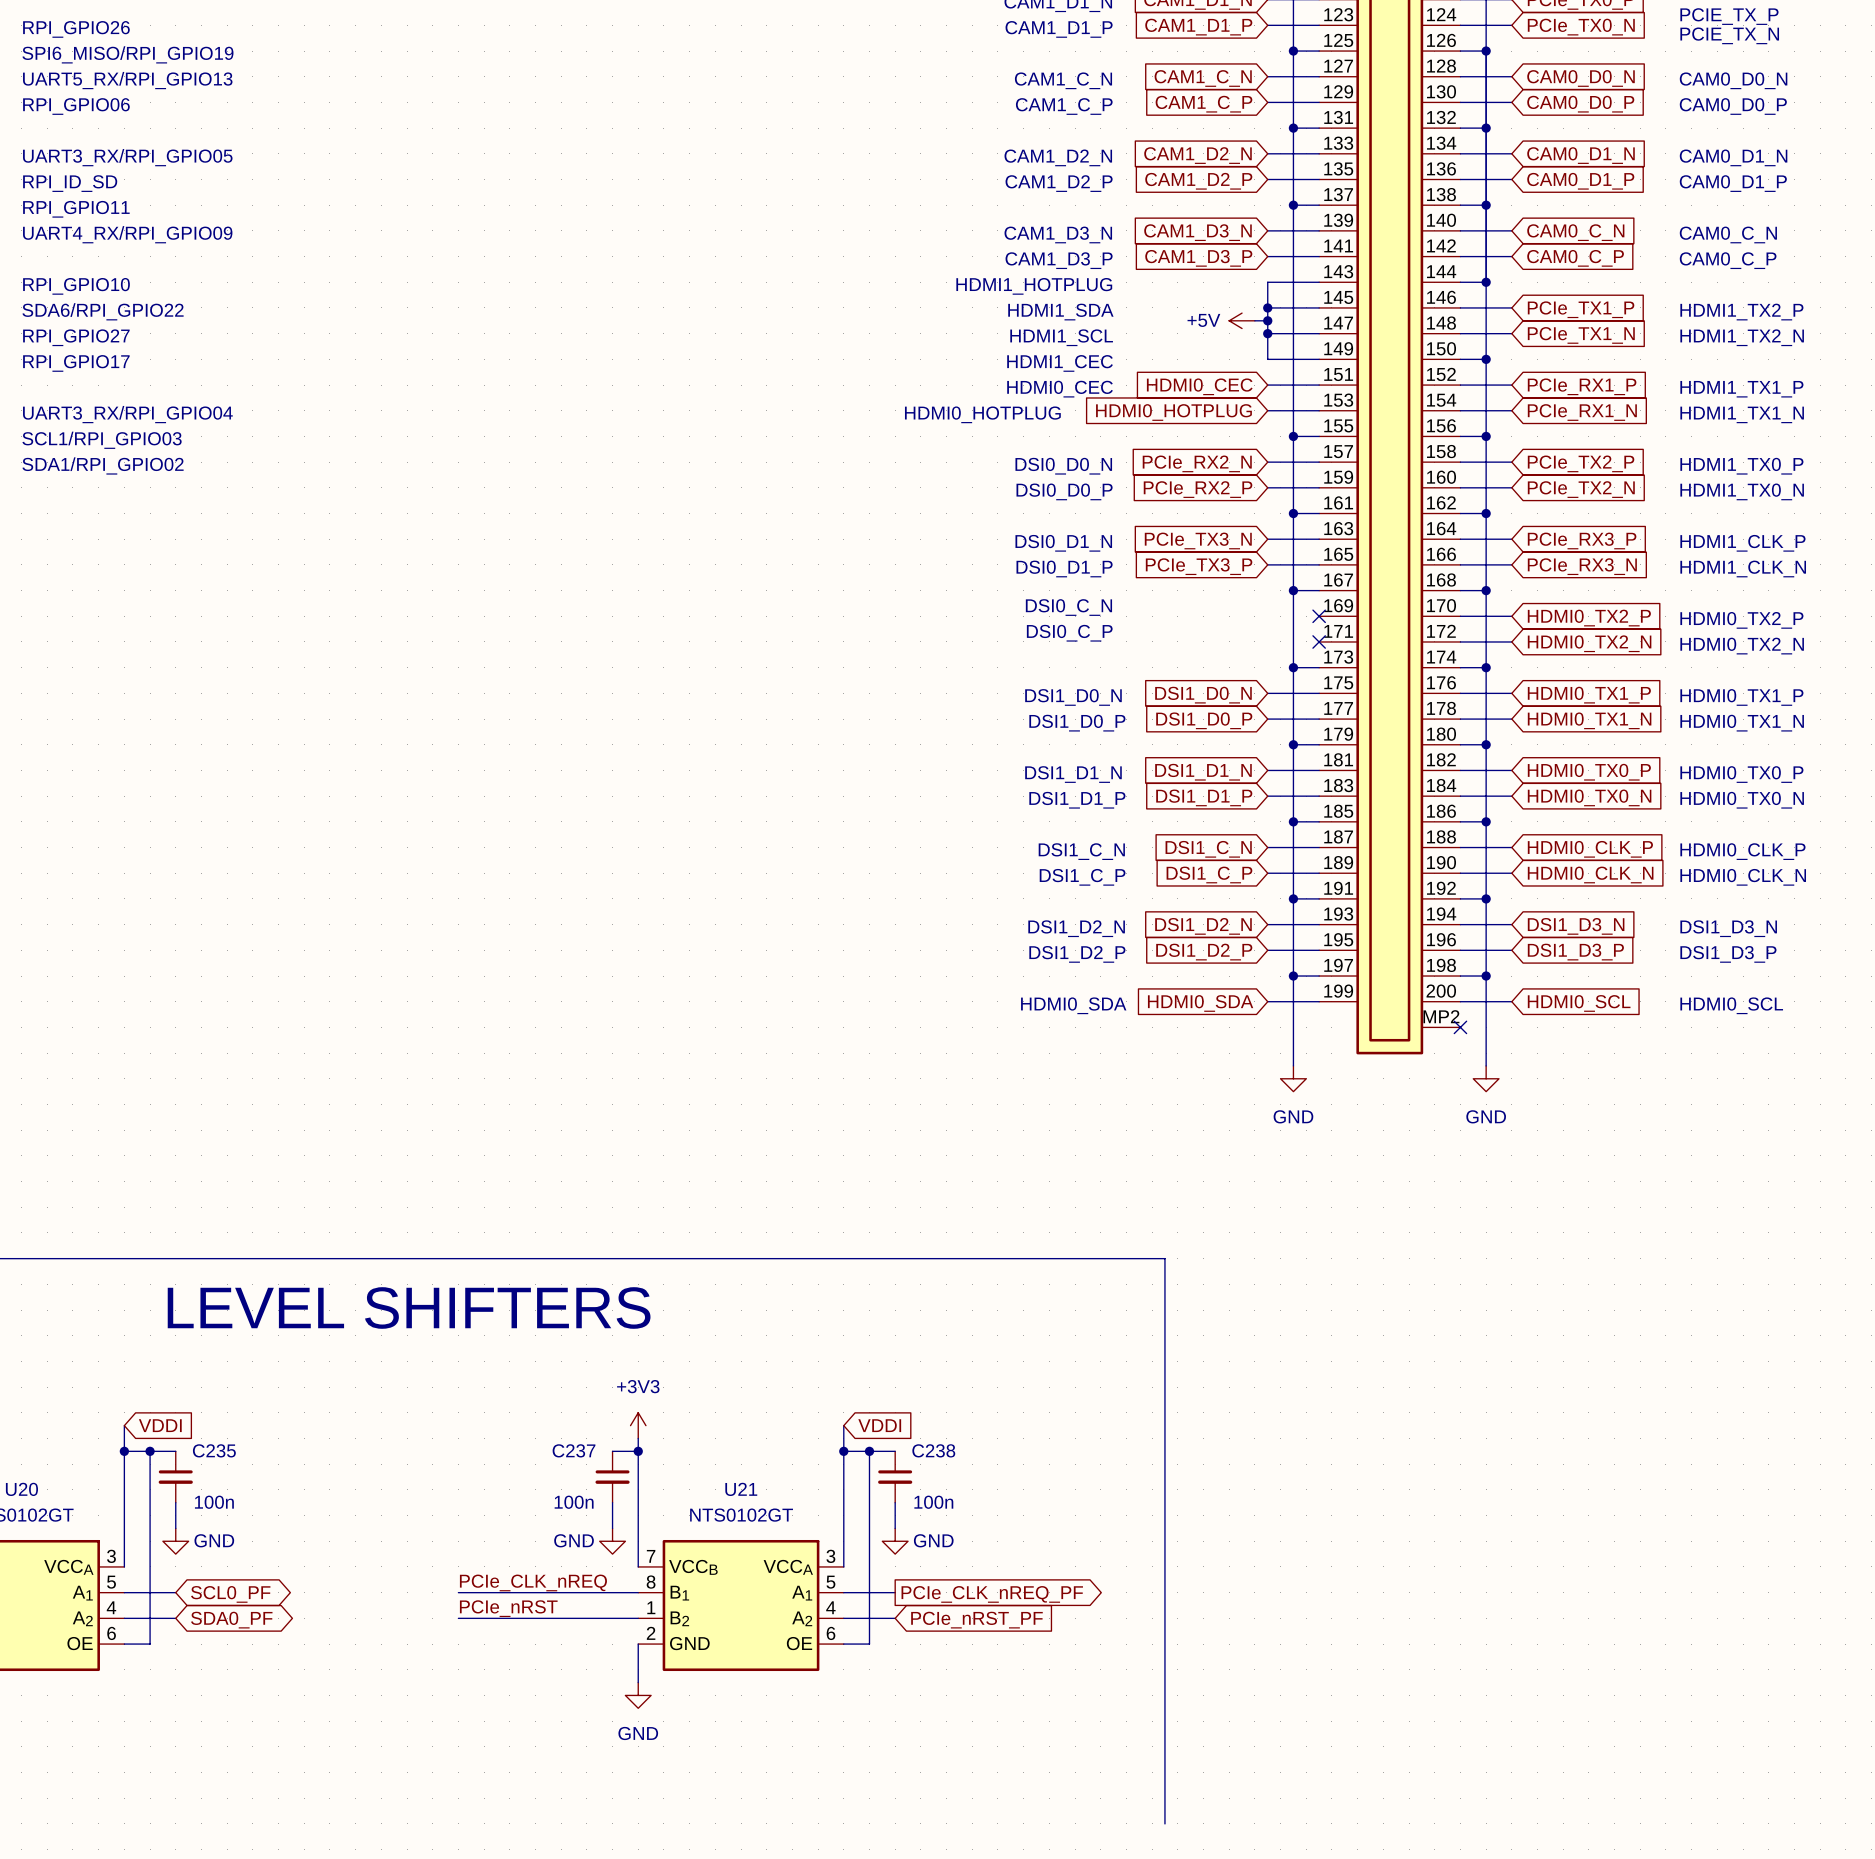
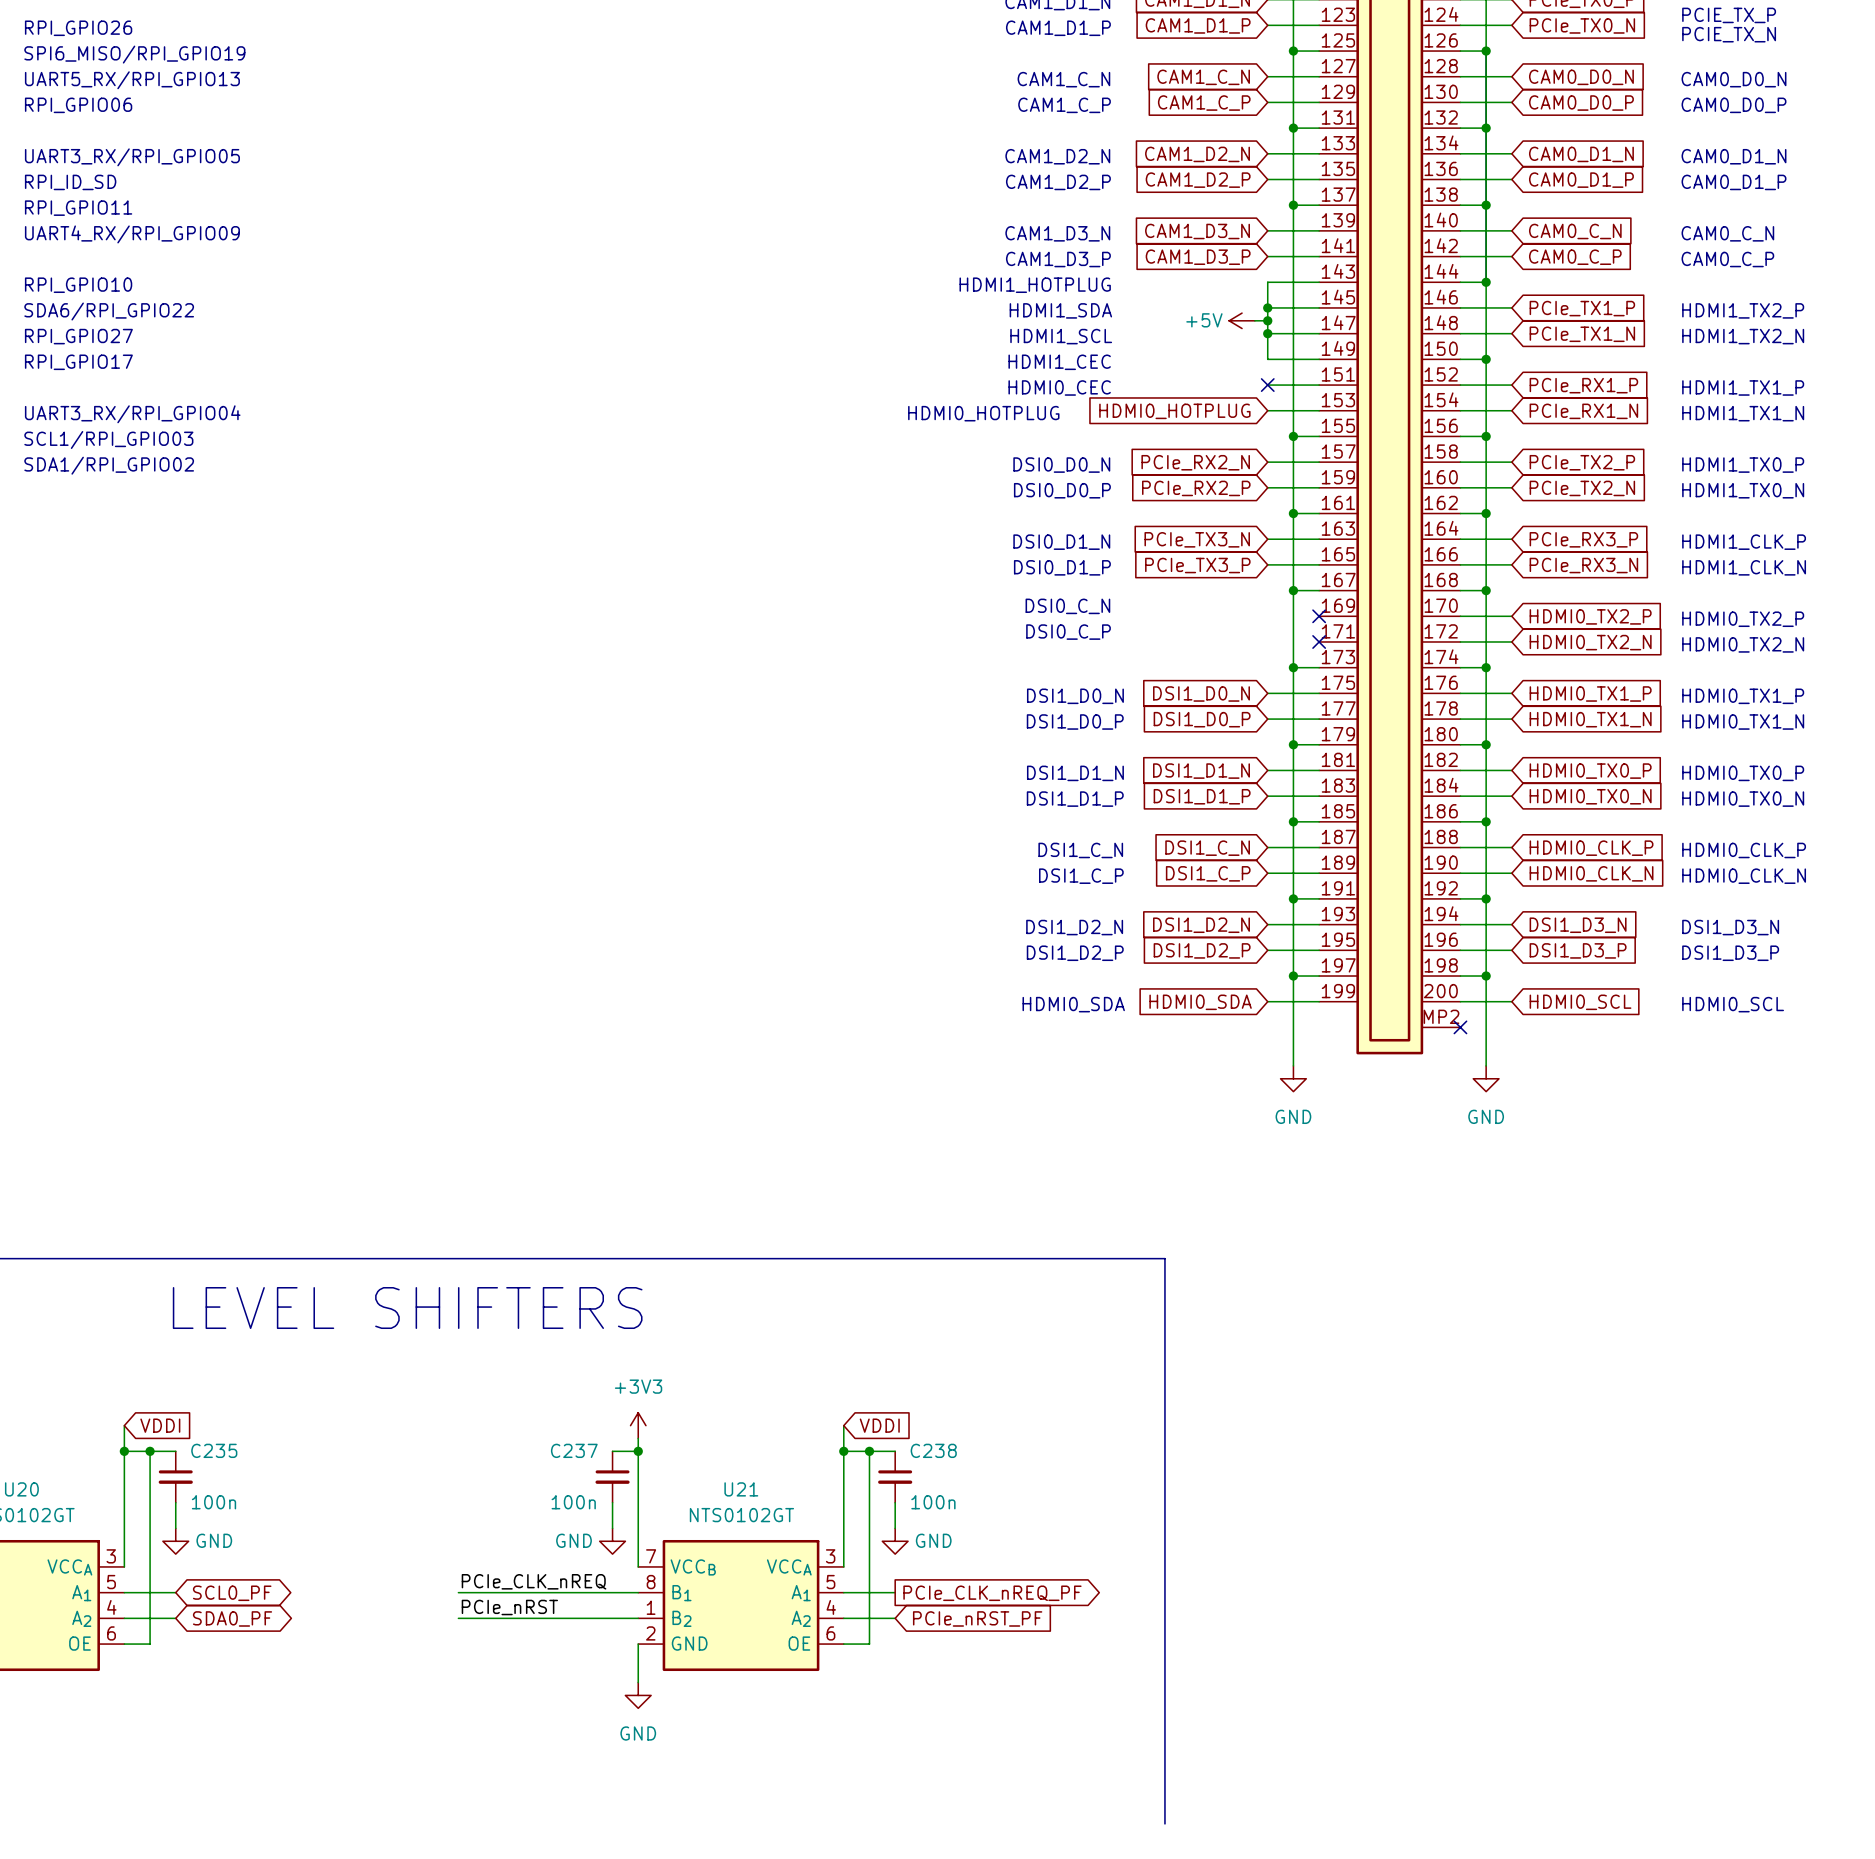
no-connect mark: none -> (1267, 385)
global label: HDMI0_CEC (1199, 386) -> none

